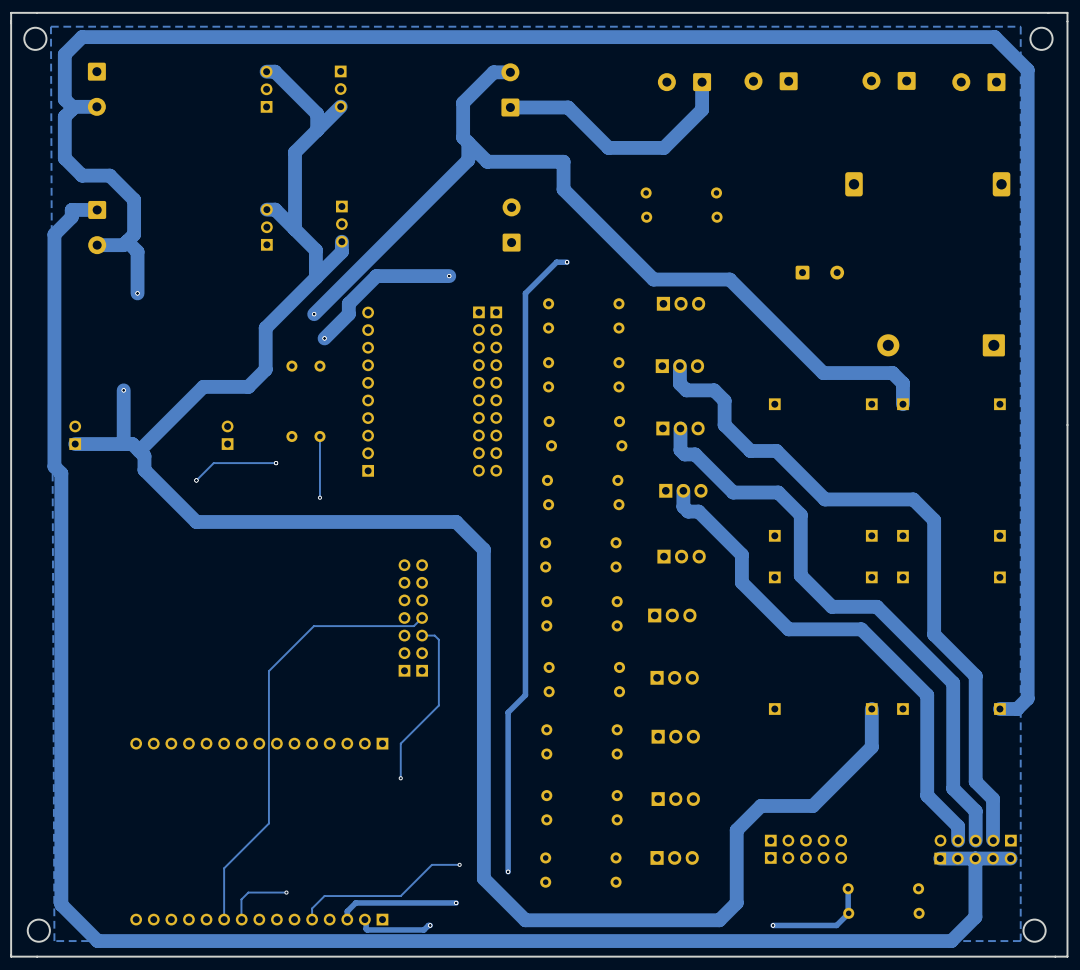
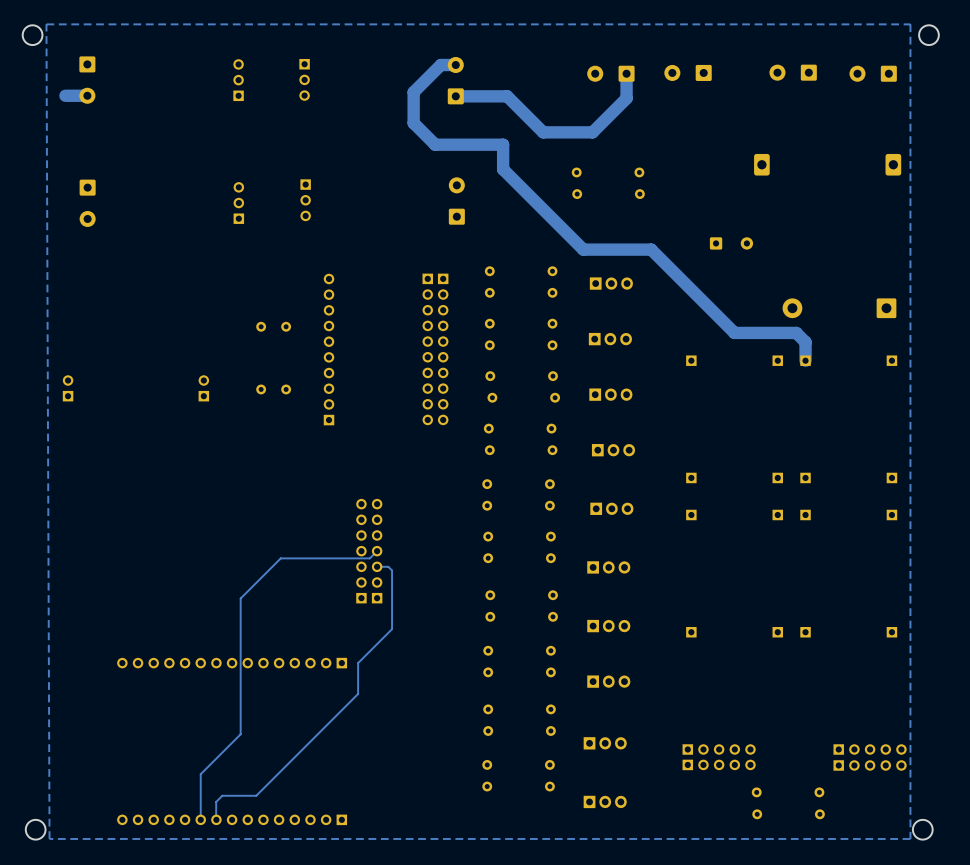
board edge: (1067, 12) (1067, 956) (11, 956) (11, 12) (1067, 12) -> none
track: (266, 71) (274, 71) (317, 113) (317, 130) -> none
track: (340, 106) (295, 152) (295, 229) -> none
track: (468, 142) (468, 160) (314, 314) -> none
track: (97, 209) (72, 209) (71, 217) (54, 234) (54, 466) (61, 473) (61, 904) (97, 941) (951, 941) (975, 917) (975, 858) -> none
track: (266, 209) (275, 209) (315, 250) (315, 277) -> none
track: (127, 241) (137, 251) (137, 293) -> none
track: (341, 241) (341, 251) (265, 328) (265, 369) (248, 386) (203, 386) (139, 450) -> none
track: (97, 245) (123, 245) (134, 234) (134, 199) (109, 175) (82, 175) (64, 158) (64, 116) (72, 109) (64, 99) (64, 54) (82, 37) (994, 37) (1027, 70) (1027, 698) (1017, 709) (999, 709) -> none
track: (567, 262) (556, 262) (525, 293) (525, 695) (508, 712) (508, 871) -> none
via: (567, 262) -> none
track: (449, 276) (376, 276) (348, 303) (348, 314) (324, 338) -> none
via: (449, 276) -> none
via: (137, 293) -> none
part position: (681, 303) -> (611, 283)
via: (314, 314) -> none
via: (324, 338) -> none
track: (679, 366) (679, 383) (686, 390) (714, 390) (724, 400) (724, 425) (750, 450) (776, 450) (825, 499) (913, 499) (934, 520) (934, 634) (975, 676) (975, 781) (993, 799) (993, 839) -> none
part position: (679, 366) -> (610, 339)
track: (123, 390) (123, 444) -> none
via: (123, 390) -> none
track: (680, 428) (680, 450) (684, 454) (695, 454) (733, 492) (778, 492) (800, 515) (800, 575) (831, 606) (876, 606) (953, 683) (953, 788) (975, 811) (975, 840) -> none
part position: (680, 428) -> (610, 394)
track: (319, 436) (319, 497) -> none
track: (75, 444) (132, 444) (144, 456) (144, 470) (196, 521) (456, 521) (483, 549) (483, 878) (525, 920) (719, 920) (736, 902) (736, 830) (760, 805) (812, 805) (871, 747) (871, 709) -> none
track: (276, 463) (213, 463) (196, 480) -> none
via: (276, 463) -> none
via: (196, 480) -> none
track: (683, 490) (683, 506) (688, 511) (698, 511) (741, 554) (741, 582) (788, 629) (861, 629) (927, 695) (927, 795) (958, 826) (958, 840) -> none
part position: (683, 490) -> (613, 450)
via: (319, 497) -> none
part position: (681, 556) -> (611, 508)
part: (672, 615) -> none
part: none -> (608, 567)
part: (674, 677) -> none
part: none -> (608, 626)
part: (675, 736) -> none
part: none -> (608, 681)
track: none -> (358, 693) (256, 795)
via: (400, 778) -> none
part: (675, 799) -> none
part: none -> (605, 743)
part rotation: 0° (975, 840) -> 180° (870, 749)
part: (674, 857) -> none
track: (1010, 858) (940, 858) -> none
track: (459, 864) (431, 864) (400, 896) (324, 896) (312, 908) (312, 919) -> none
via: (459, 864) -> none
via: (508, 871) -> none
track: (848, 888) (848, 913) (836, 925) (773, 925) -> none
via: (286, 892) -> none
part: none -> (605, 801)
track: (456, 902) (355, 902) (347, 911) (347, 919) -> none
via: (456, 902) -> none
track: (364, 919) (367, 929) (423, 929) (430, 925) -> none
via: (430, 925) -> none
via: (773, 925) -> none

